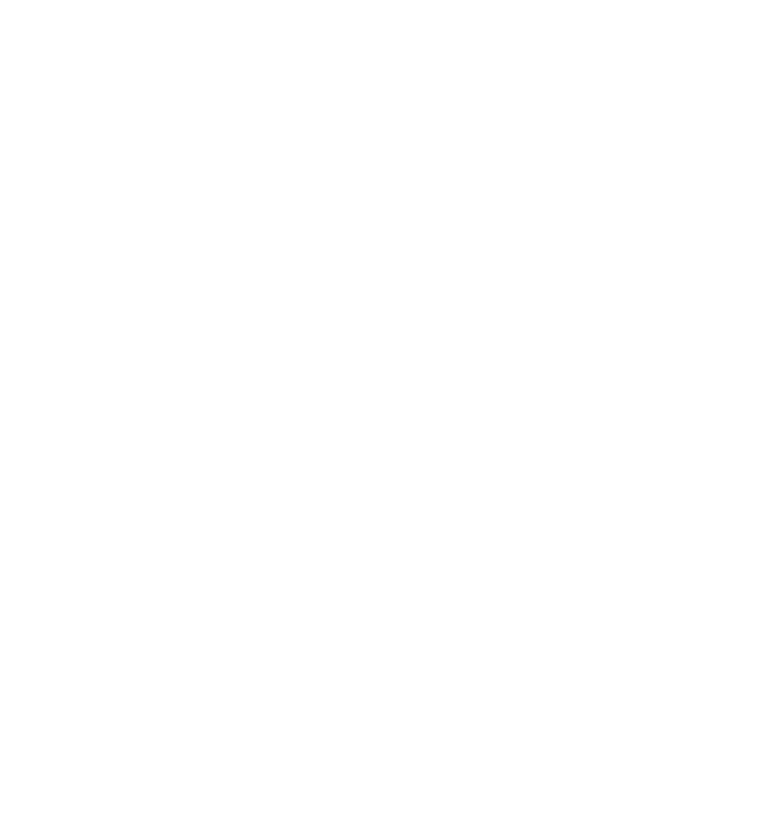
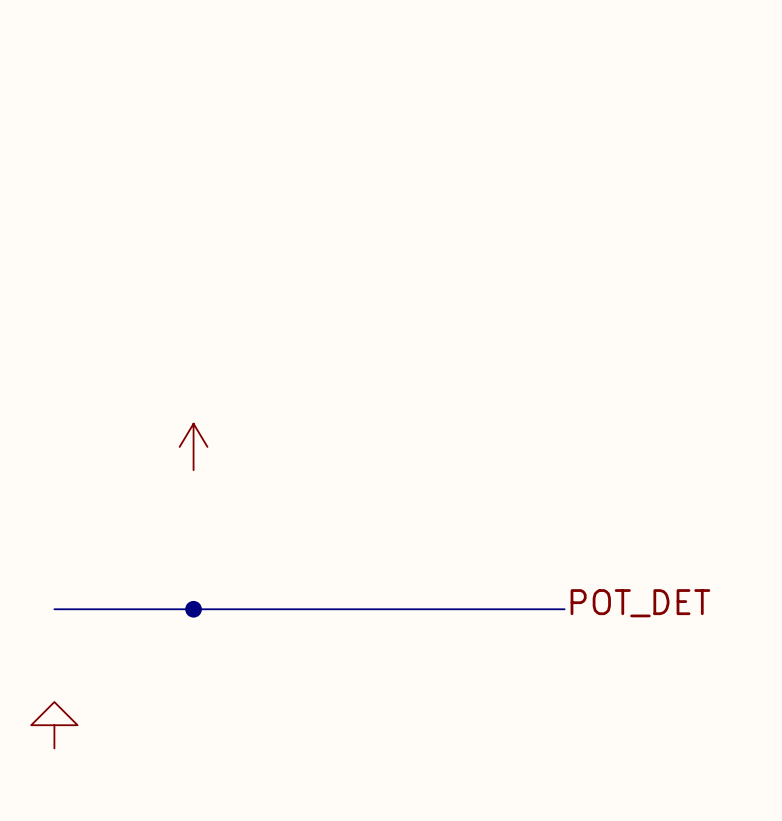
power symbol: none -> (193, 446)
label: none -> POT_DET (640, 603)
wire: none -> (54, 609) (564, 609)
junction: none -> (193, 609)
power symbol: none -> (54, 725)

